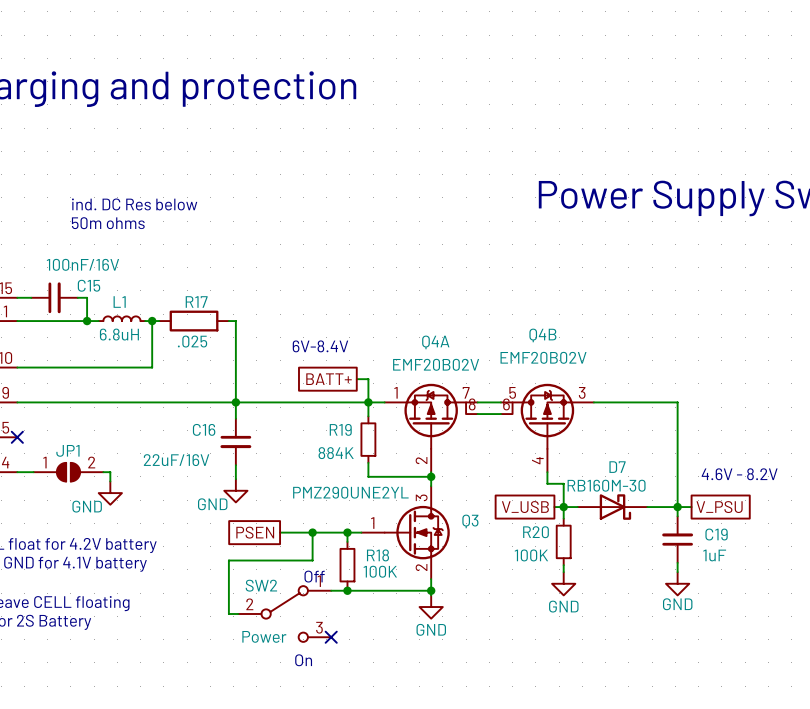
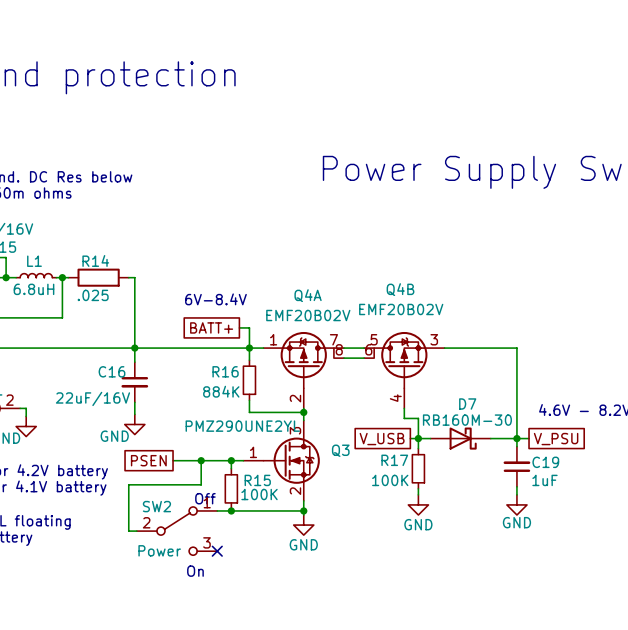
R17 name: R17 (196, 302) -> R14 (95, 260)
R19 name: R19 (340, 429) -> R16 (225, 371)
R20 name: R20 (535, 532) -> R17 (394, 460)
R18 name: R18 (377, 555) -> R15 (257, 480)

